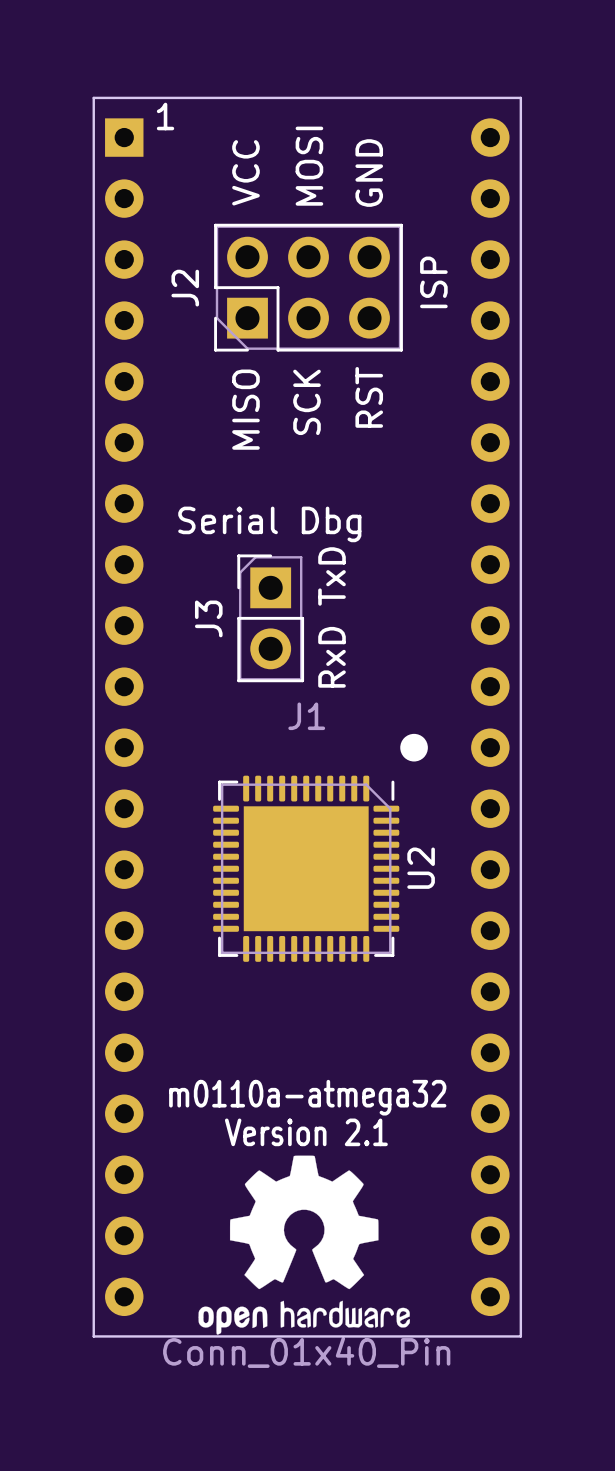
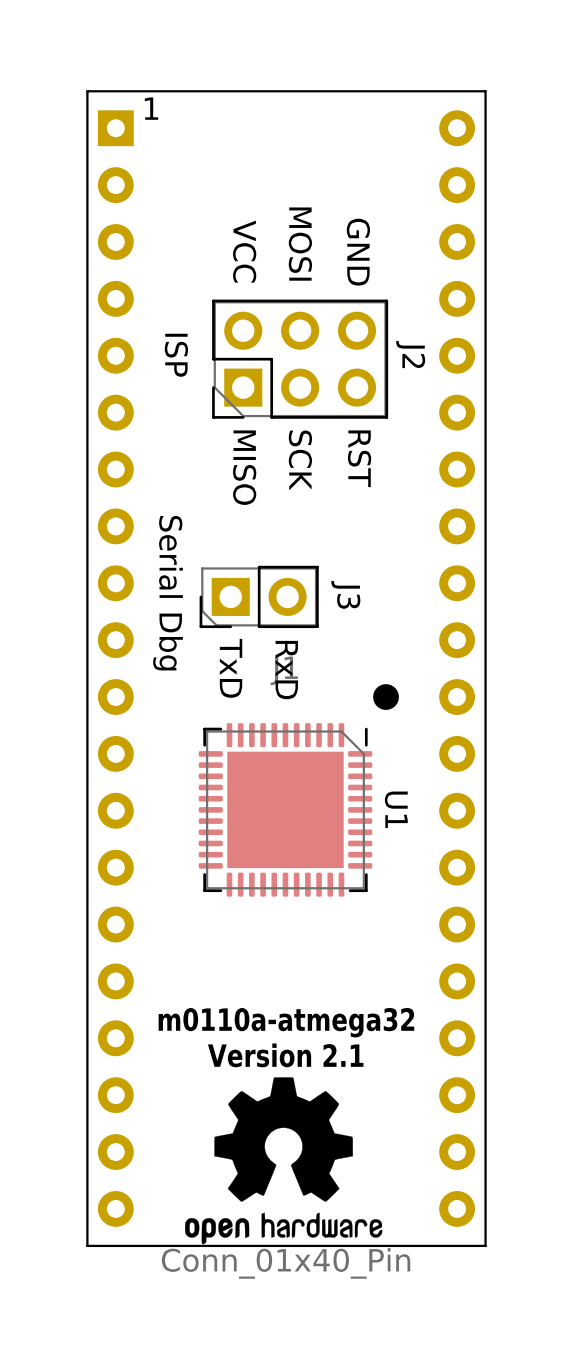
text rotation: 0° (309, 166) -> 180° (300, 244)
text position: MOSI (309, 166) -> MOSI (300, 244)
text rotation: 0° (245, 172) -> 180° (244, 251)
text position: VCC (245, 172) -> VCC (244, 251)
text rotation: 0° (369, 173) -> 180° (358, 252)
text position: GND (369, 173) -> GND (358, 252)
text rotation: 0° (433, 282) -> 180° (176, 355)
text position: ISP (433, 282) -> ISP (176, 355)
J2 position: (308, 287) -> (300, 359)
J2 name rotation: 0° (185, 288) -> 180° (410, 354)
J2 name position: J2 (185, 288) -> J2 (410, 354)
text rotation: 0° (369, 397) -> 180° (359, 458)
text position: RST (369, 397) -> RST (359, 458)
text rotation: 0° (306, 402) -> 180° (300, 460)
text position: SCK (306, 402) -> SCK (300, 460)
text rotation: 0° (245, 409) -> 180° (244, 467)
text position: MISO (245, 409) -> MISO (244, 467)
text rotation: 0° (269, 524) -> 90° clockwise (168, 593)
text rotation: 0° (332, 576) -> 180° (231, 668)
text position: TxD (332, 576) -> TxD (231, 668)
J3 name position: J3 (208, 618) -> J3 (345, 594)
J3 rotation: 0° (270, 618) -> 90° counterclockwise (259, 596)
text rotation: 0° (332, 657) -> 180° (286, 670)
U2 name: U2 (421, 868) -> U1 (396, 809)

